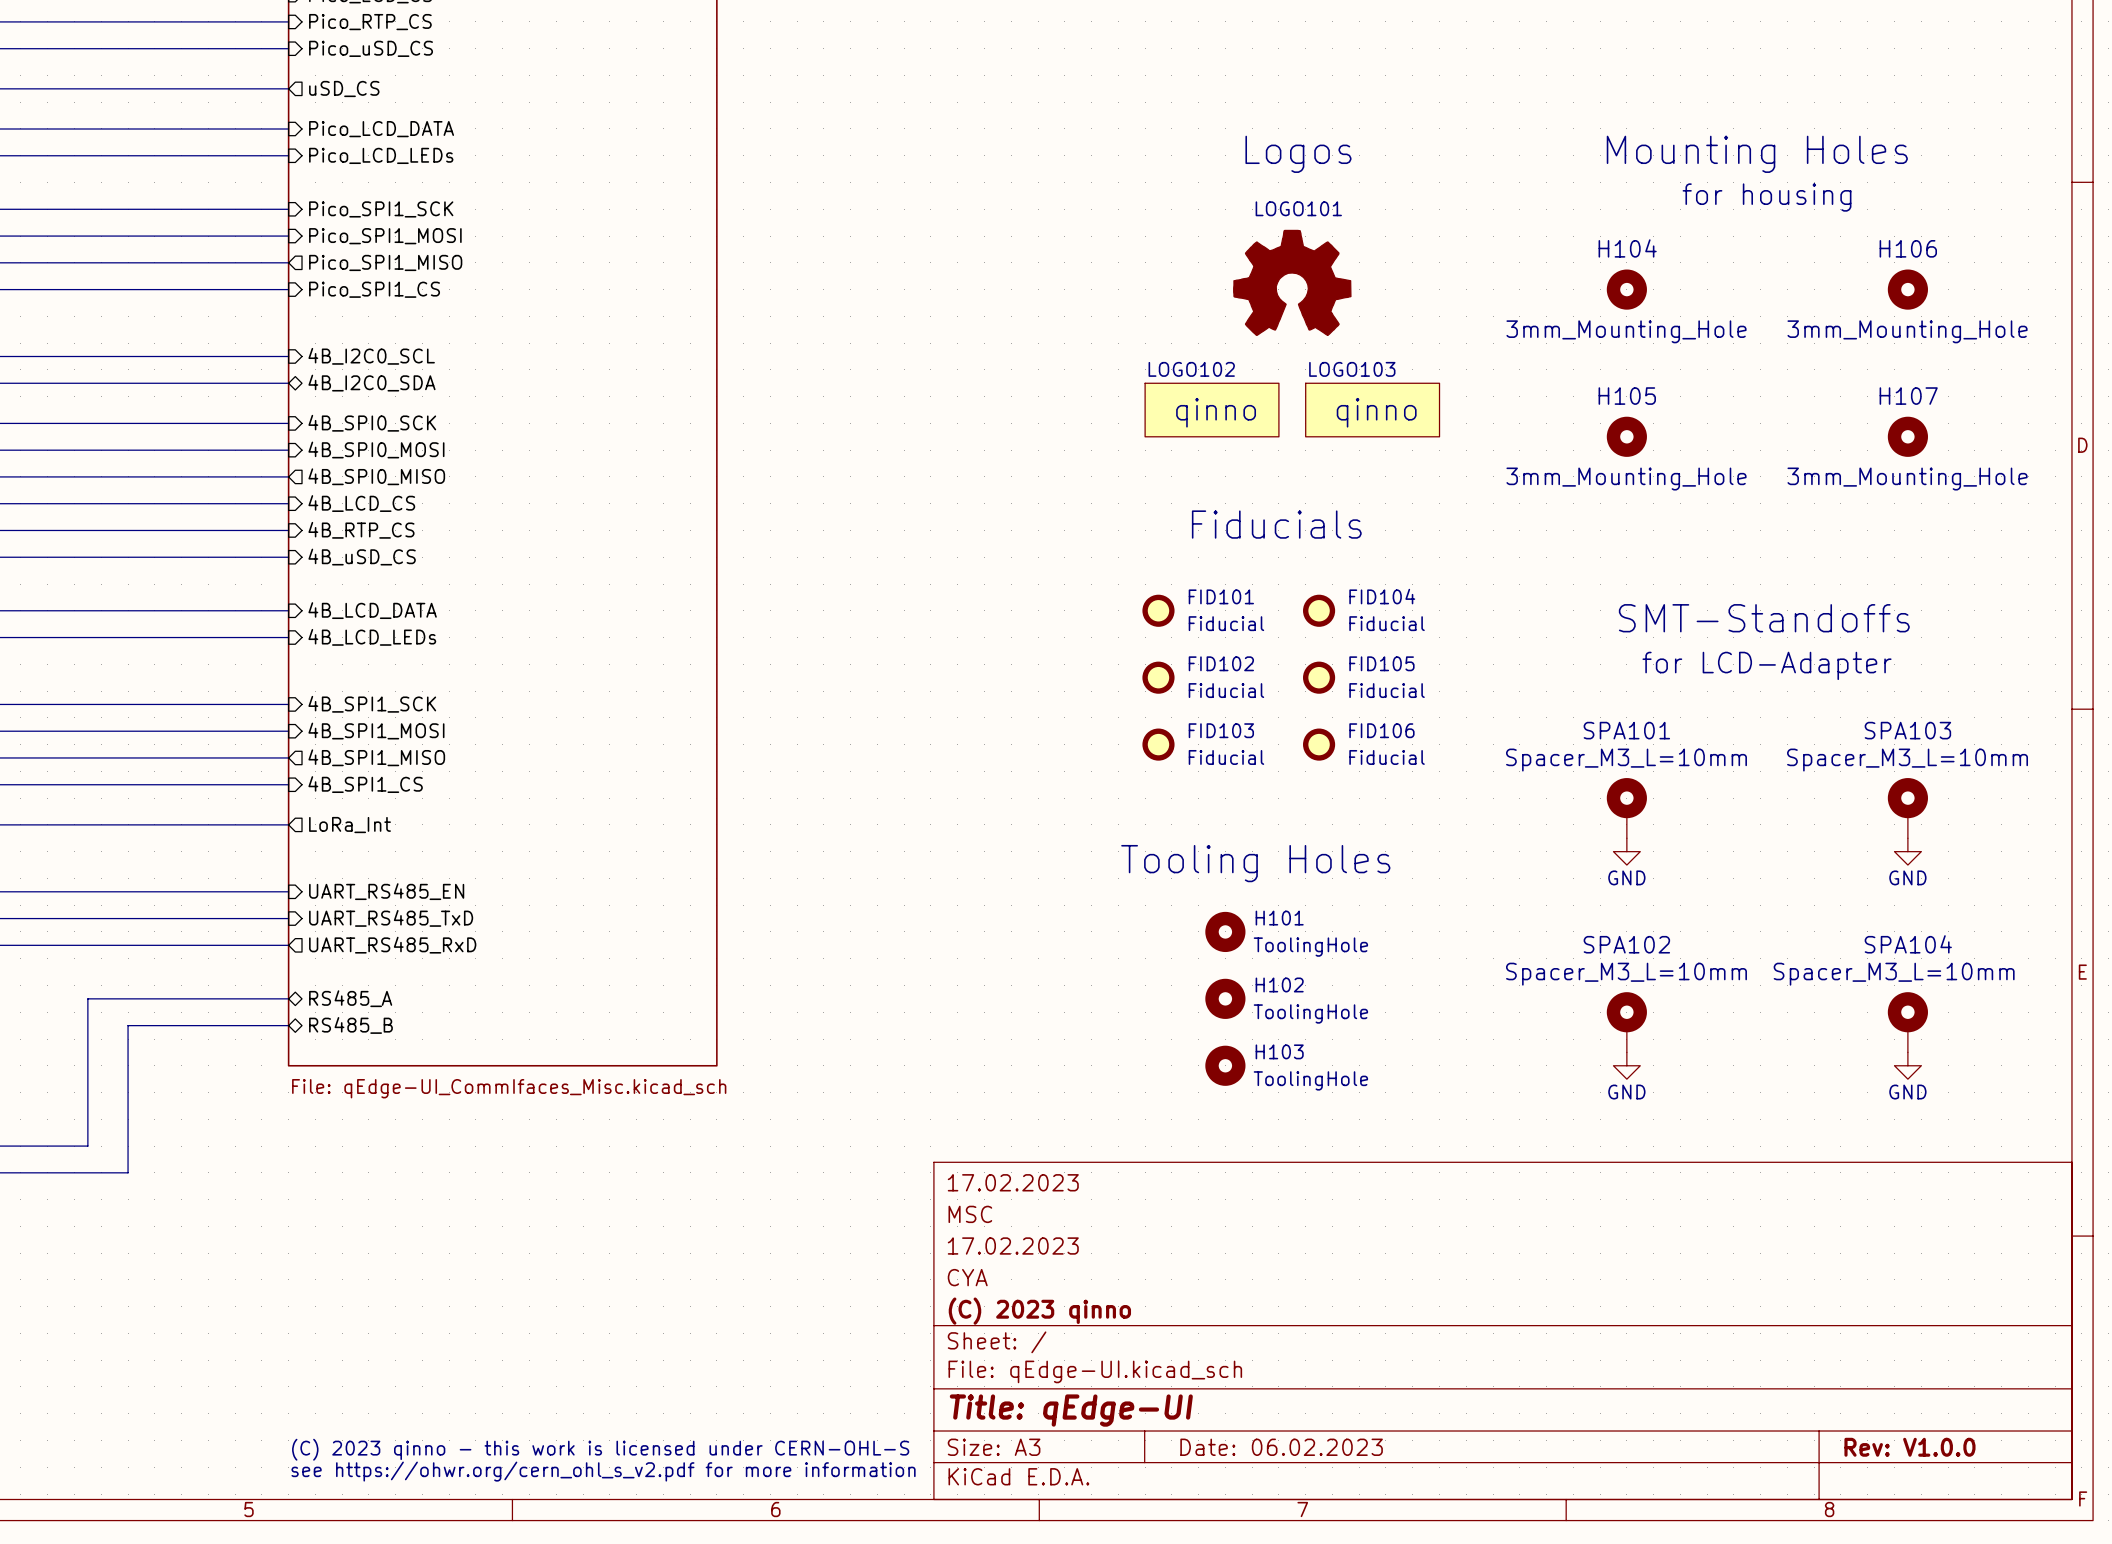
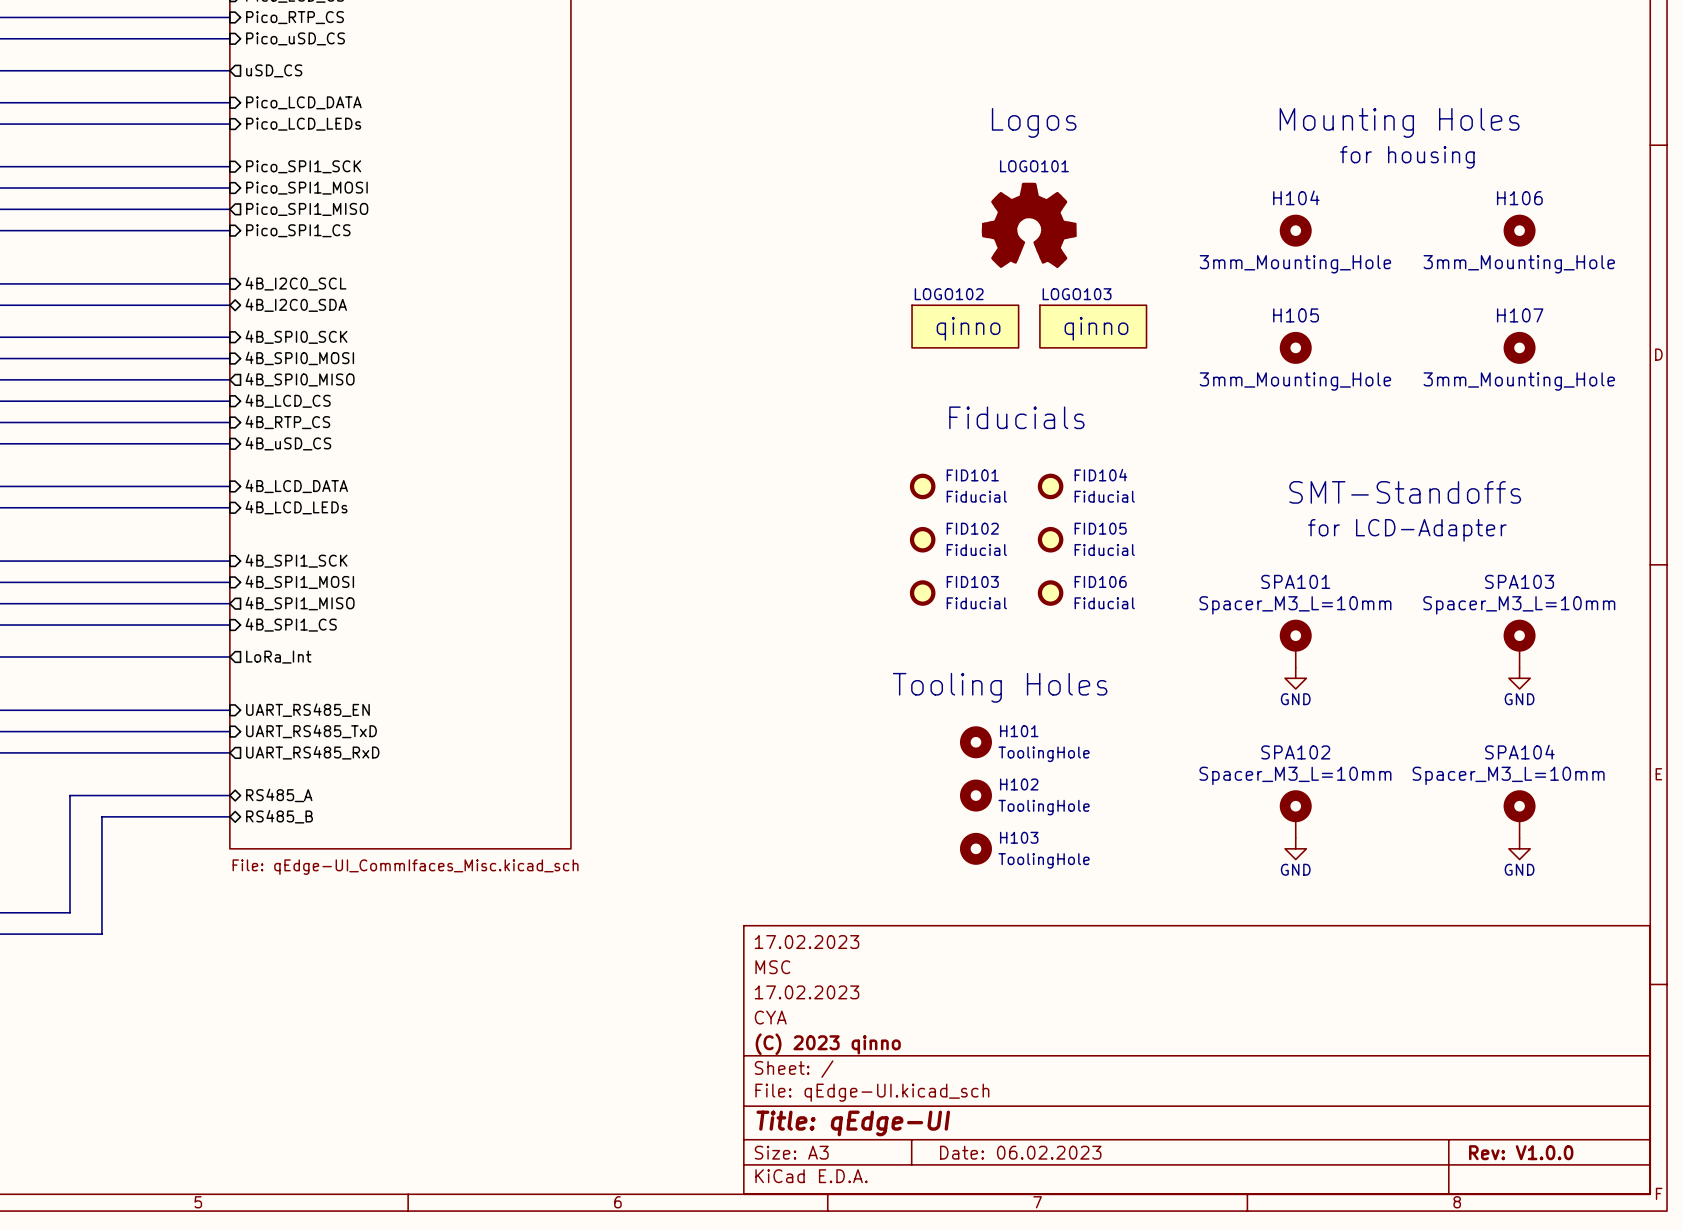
text: (C) 2023 qinno - this work is licensed under CERN-OHL-S (600, 1449) -> none
text: see https://ohwr.org/cern_ohl_s_v2.pdf for more information (603, 1471) -> none

